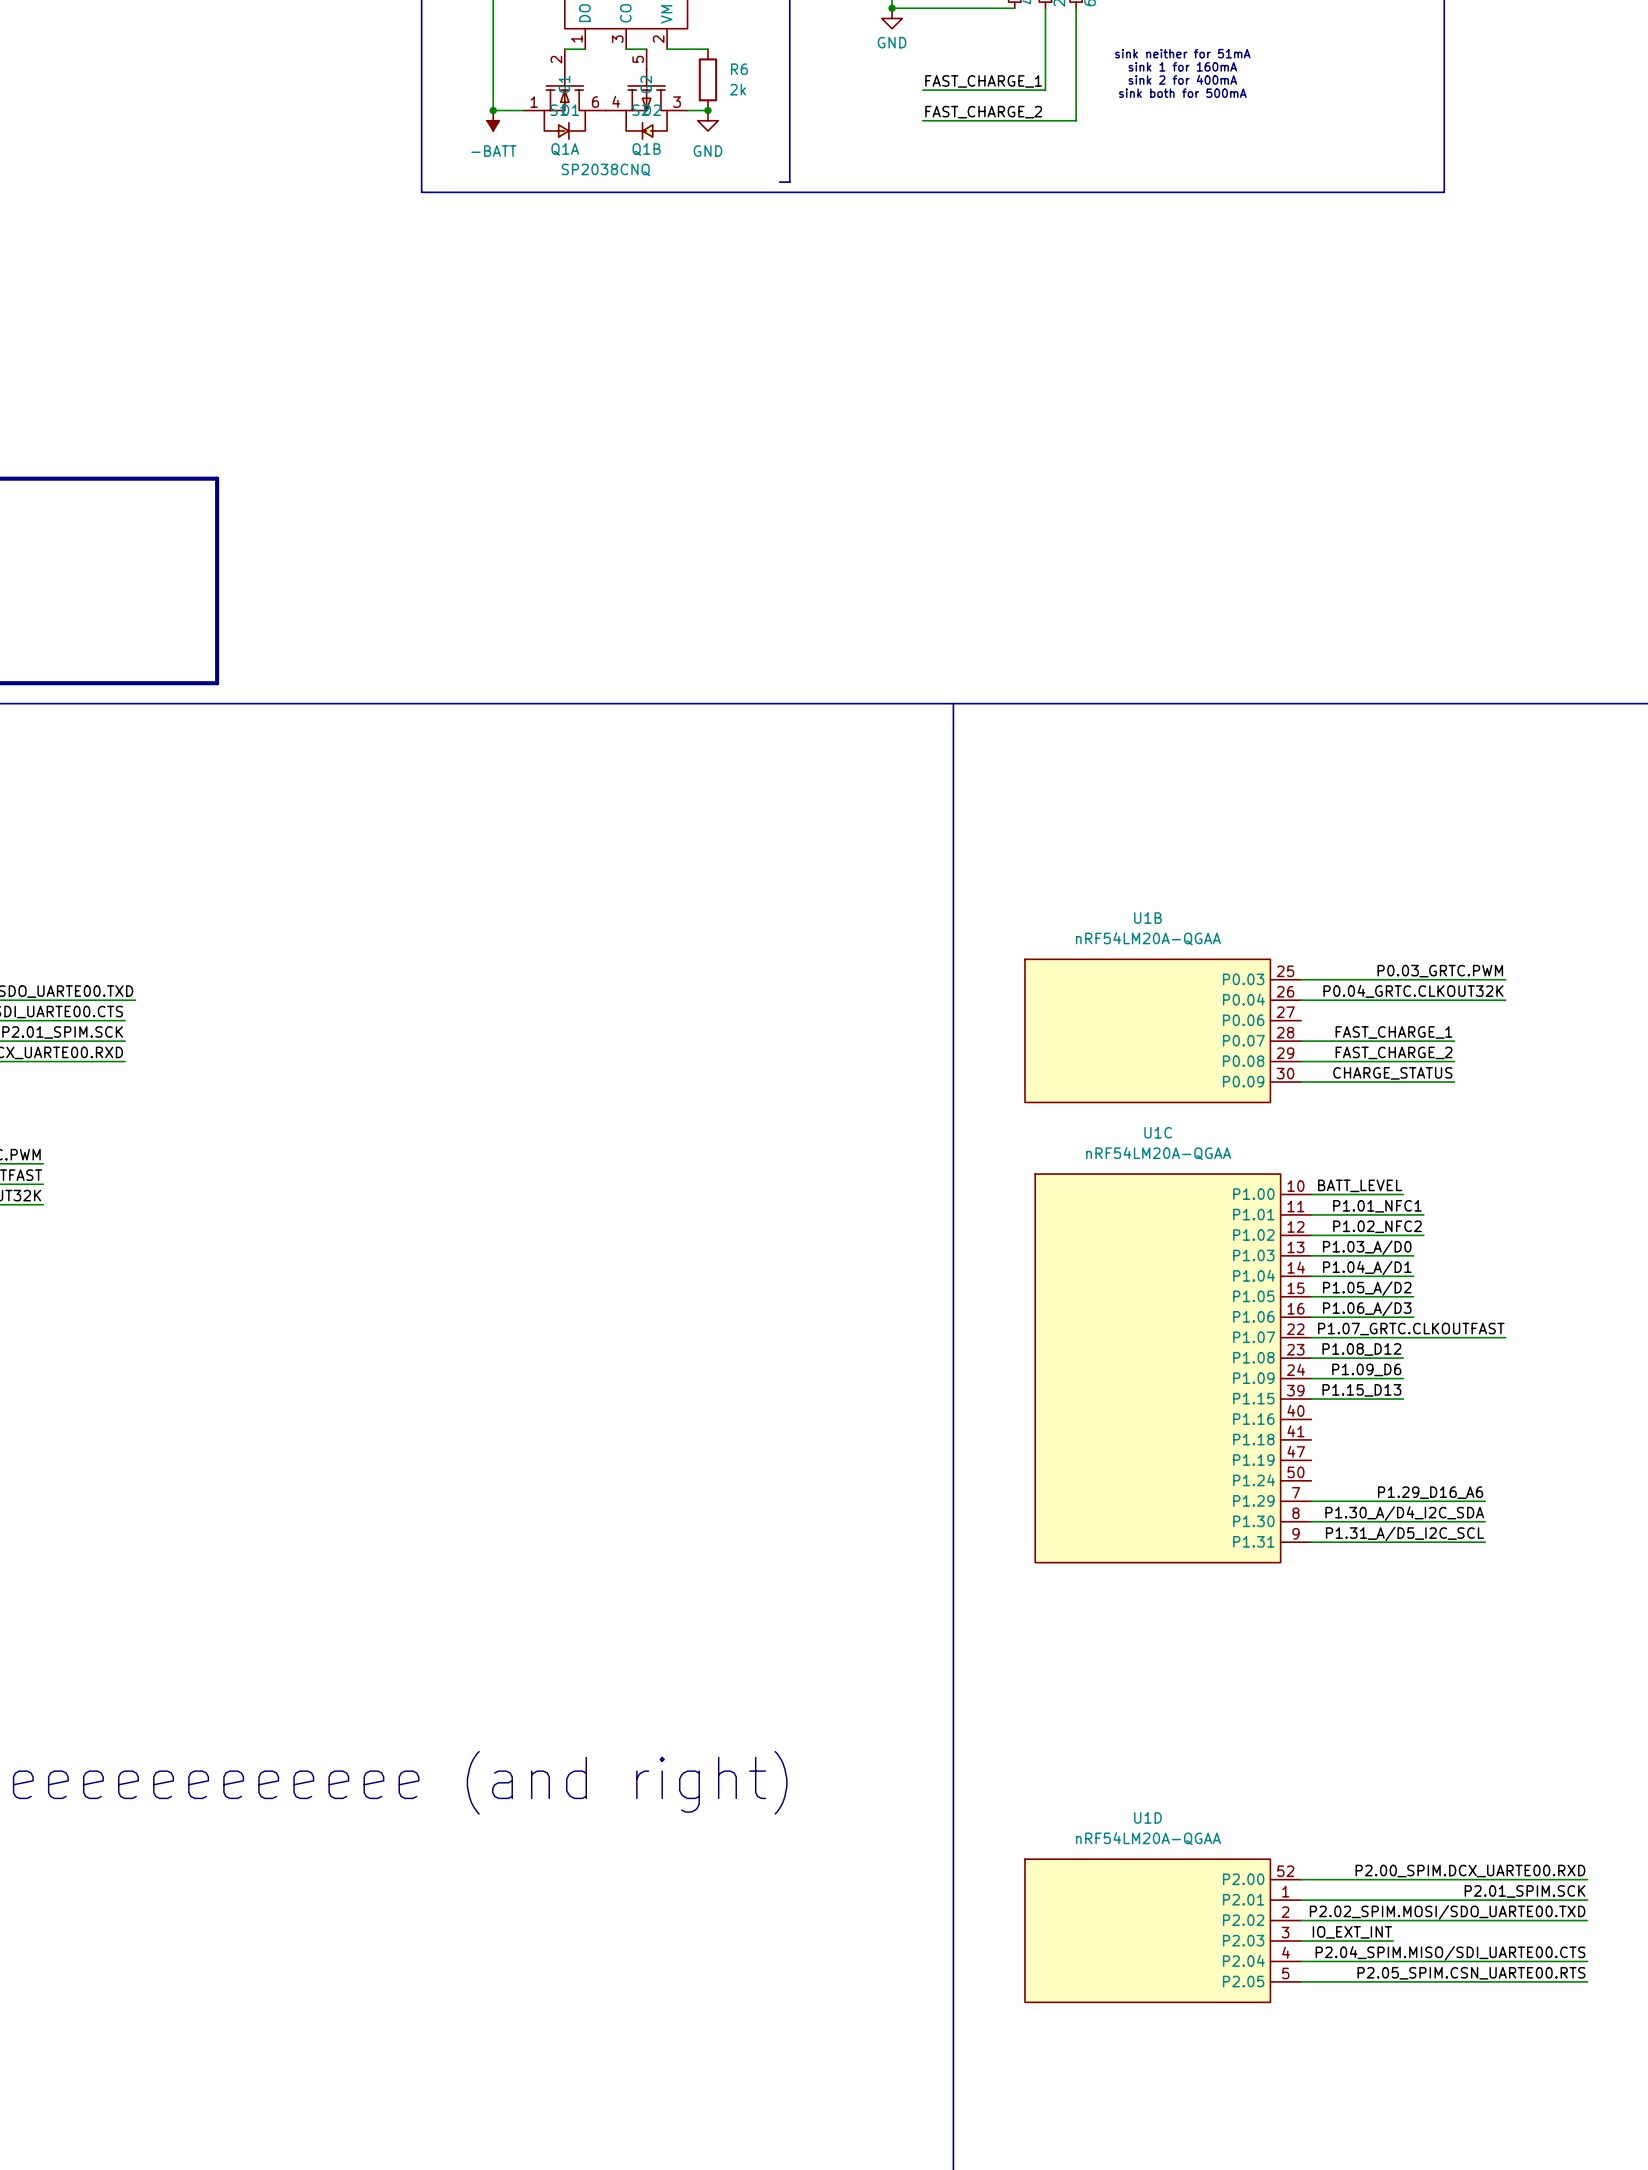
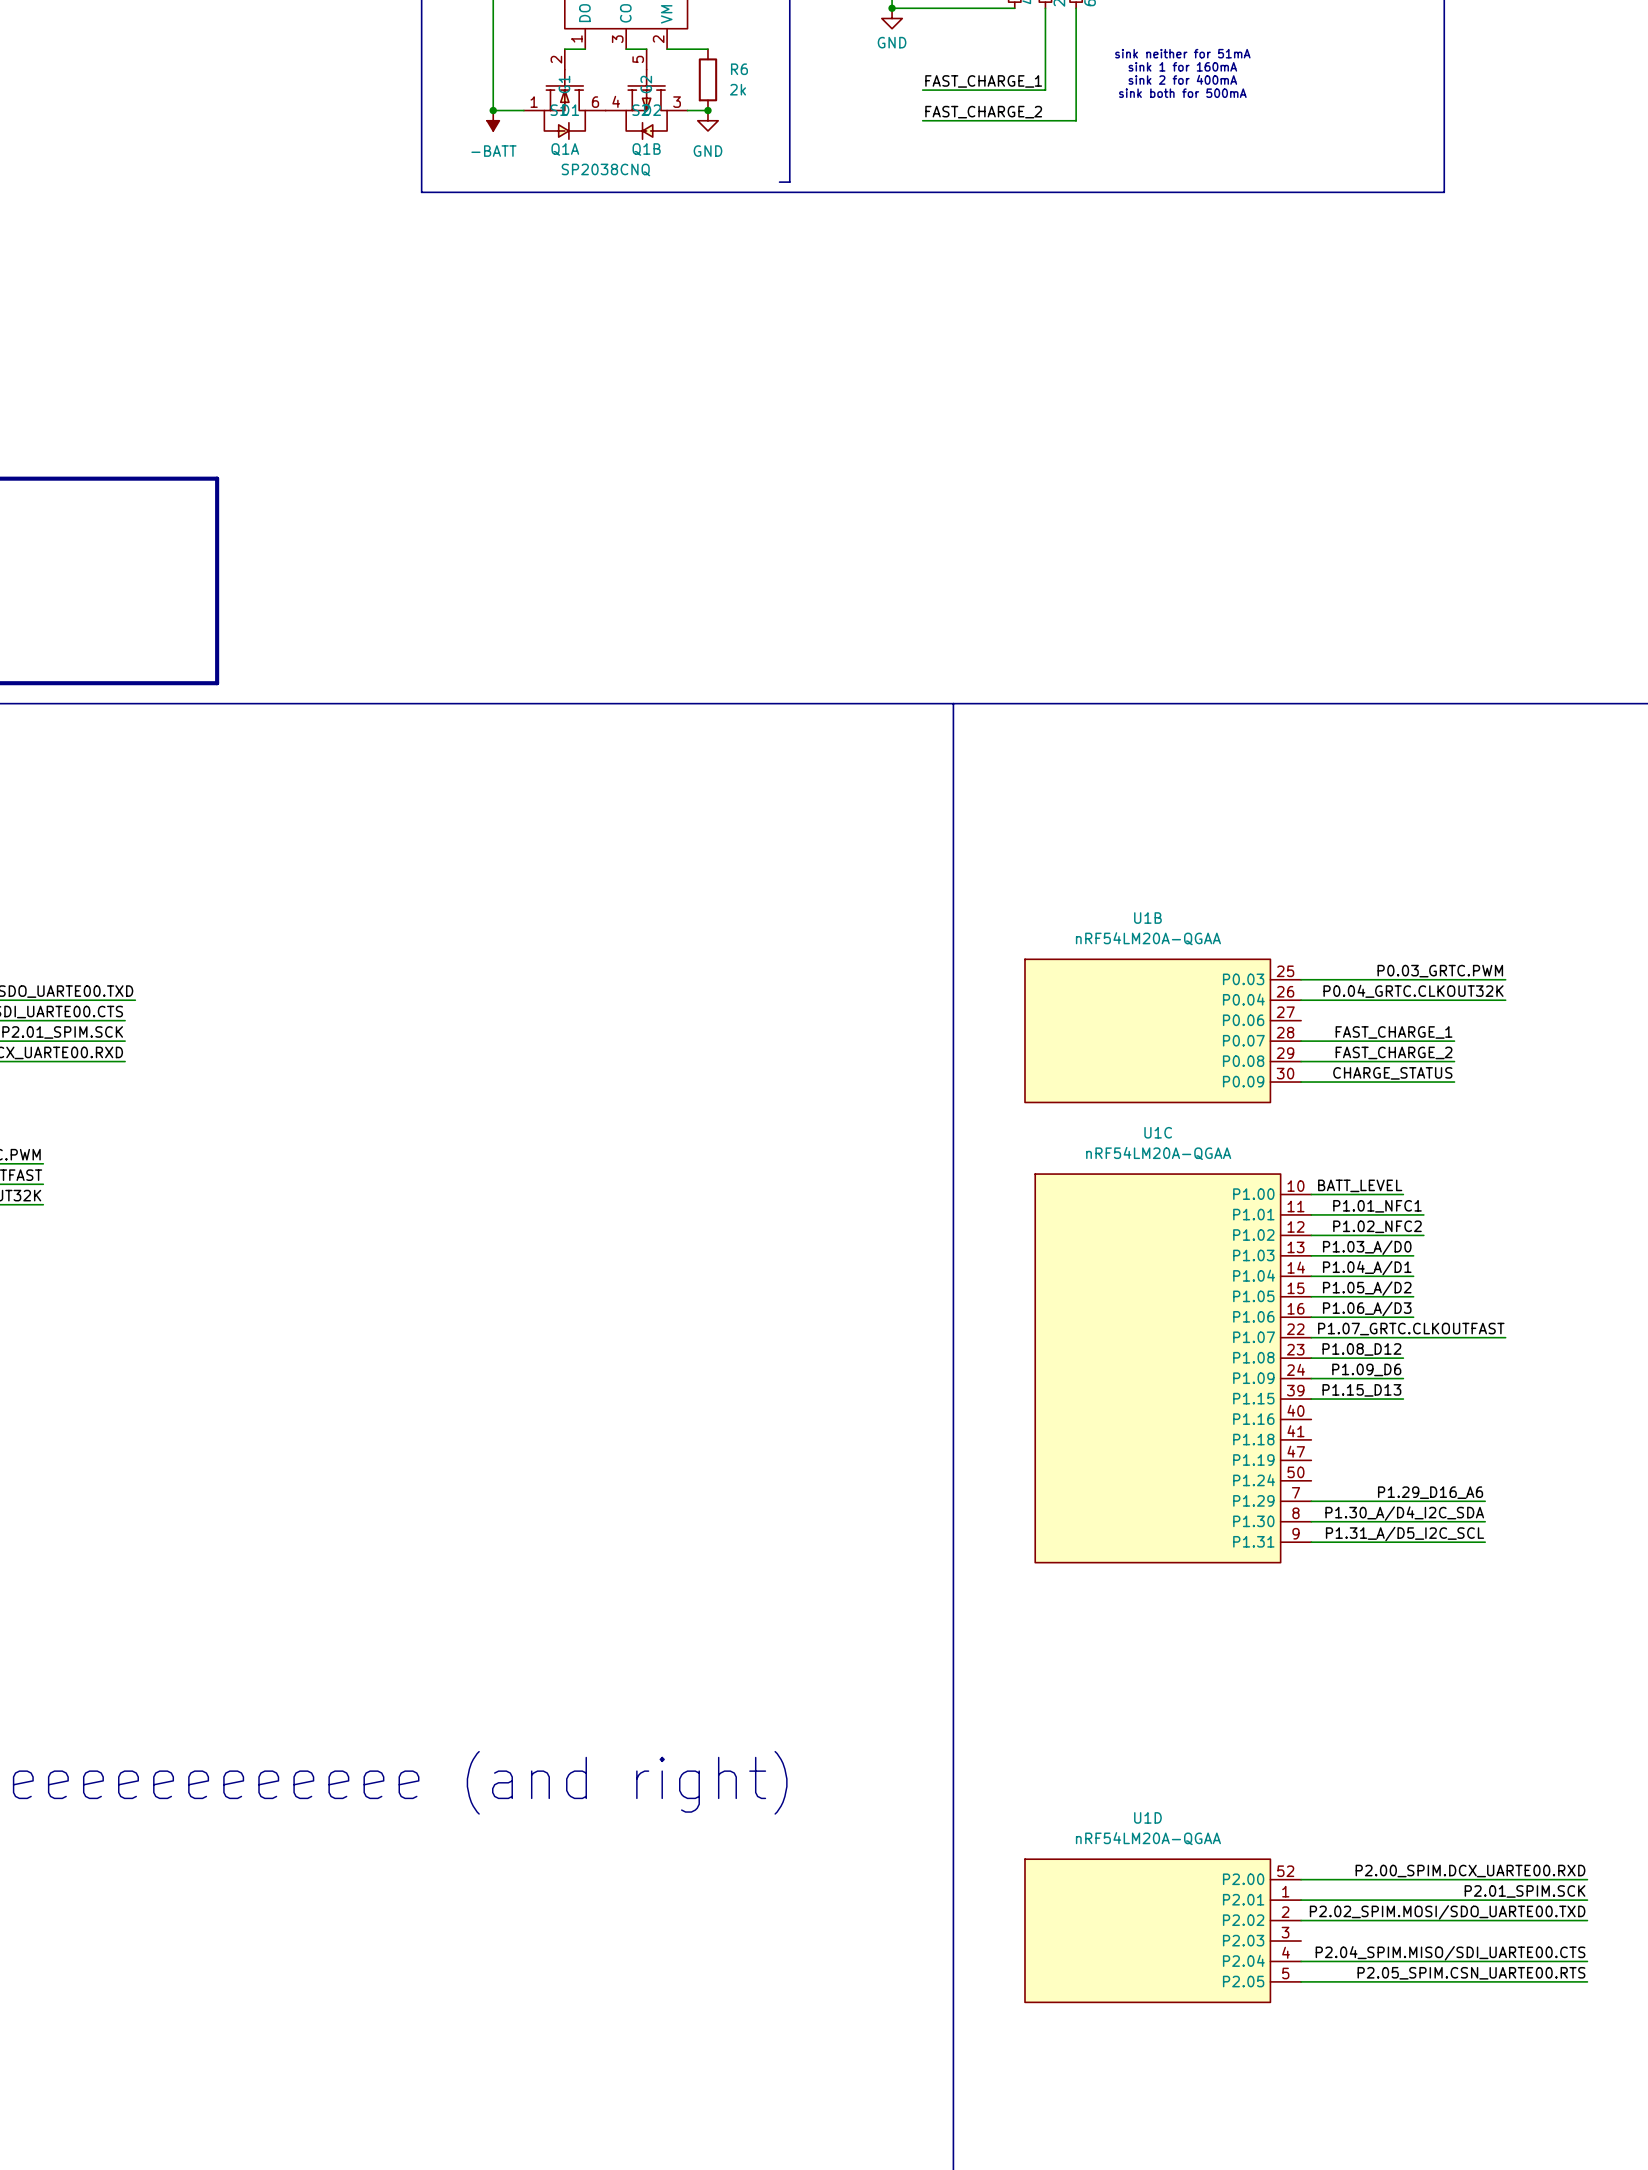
label: IO_EXT_INT (1352, 1932) -> none
wire: (1301, 1941) (1393, 1941) -> none

